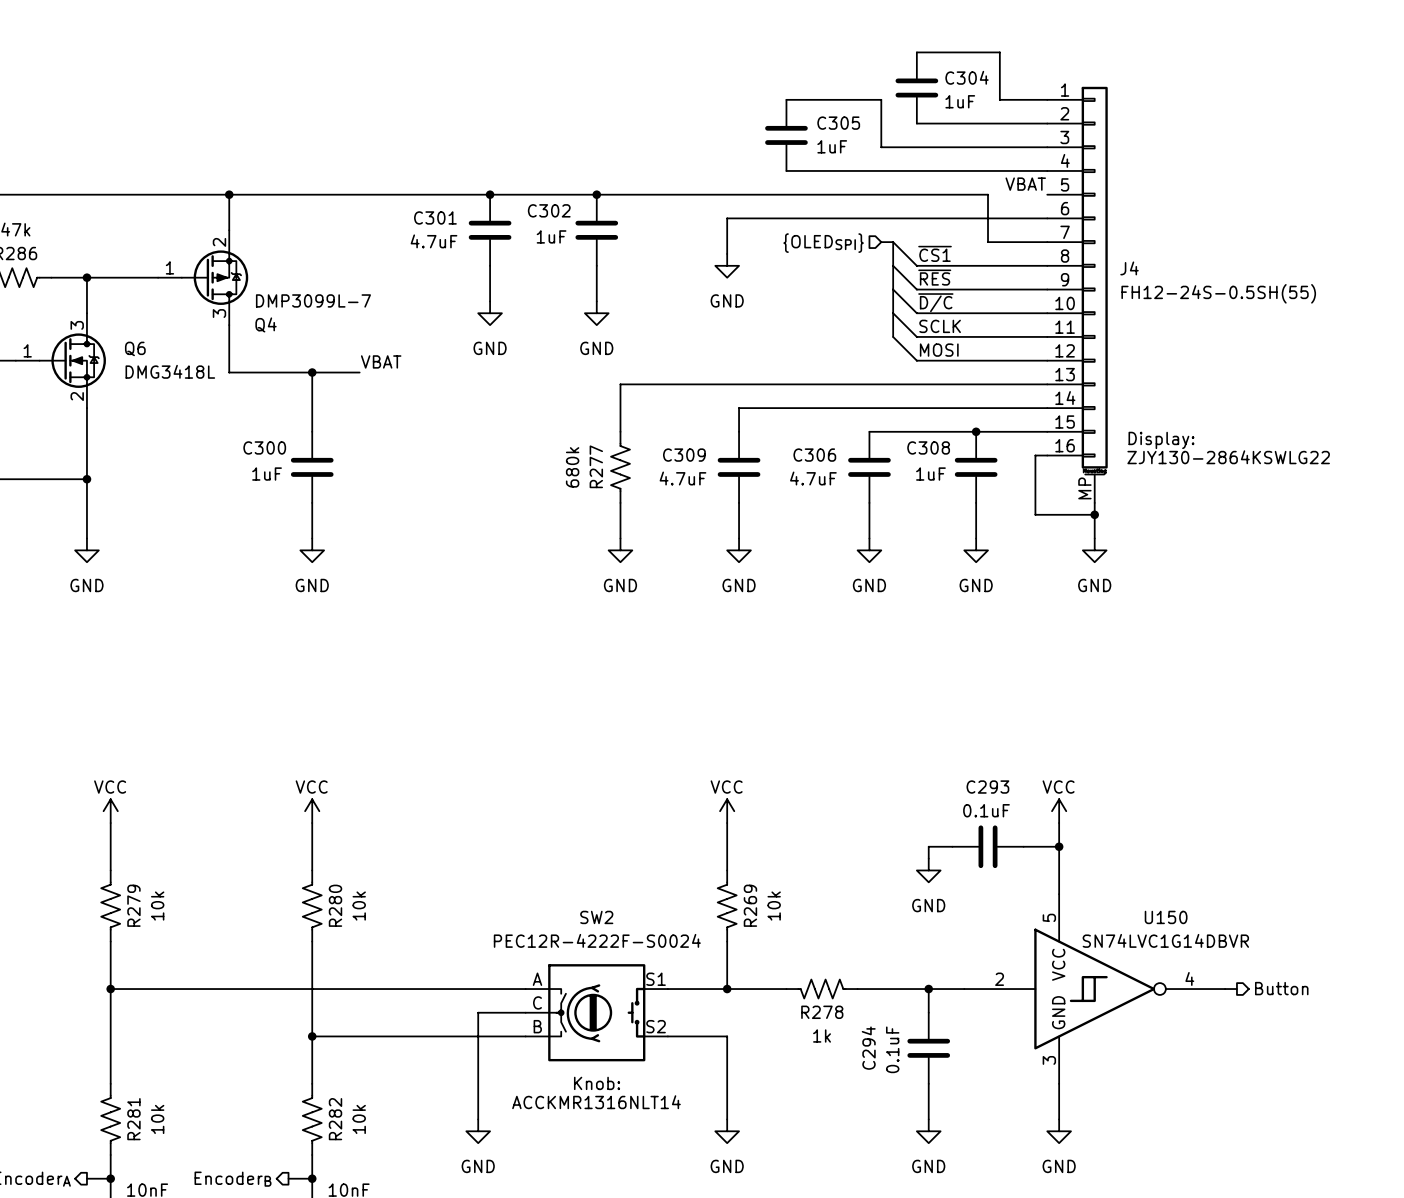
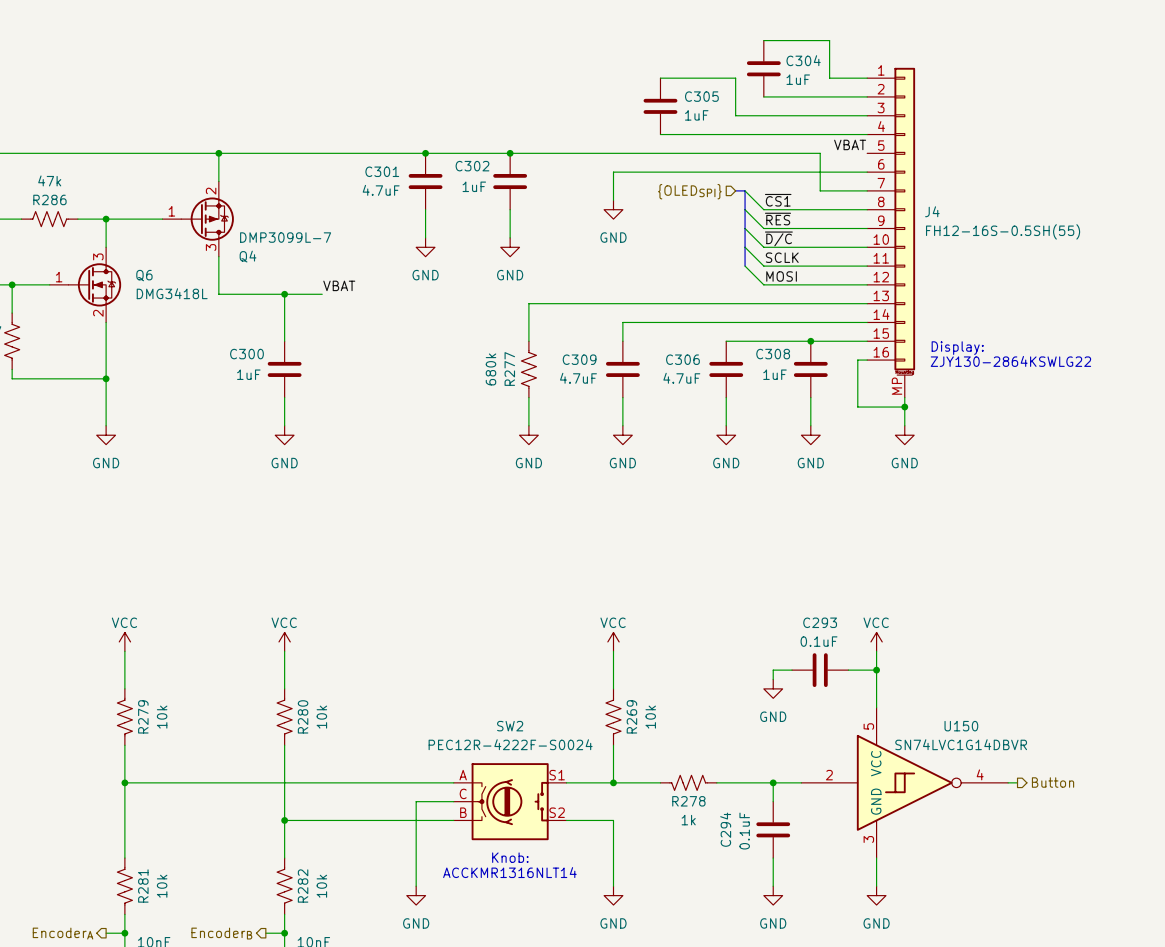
J4 value: FH12-24S-0.5SH(55) (1218, 293) -> FH12-16S-0.5SH(55) (1003, 231)

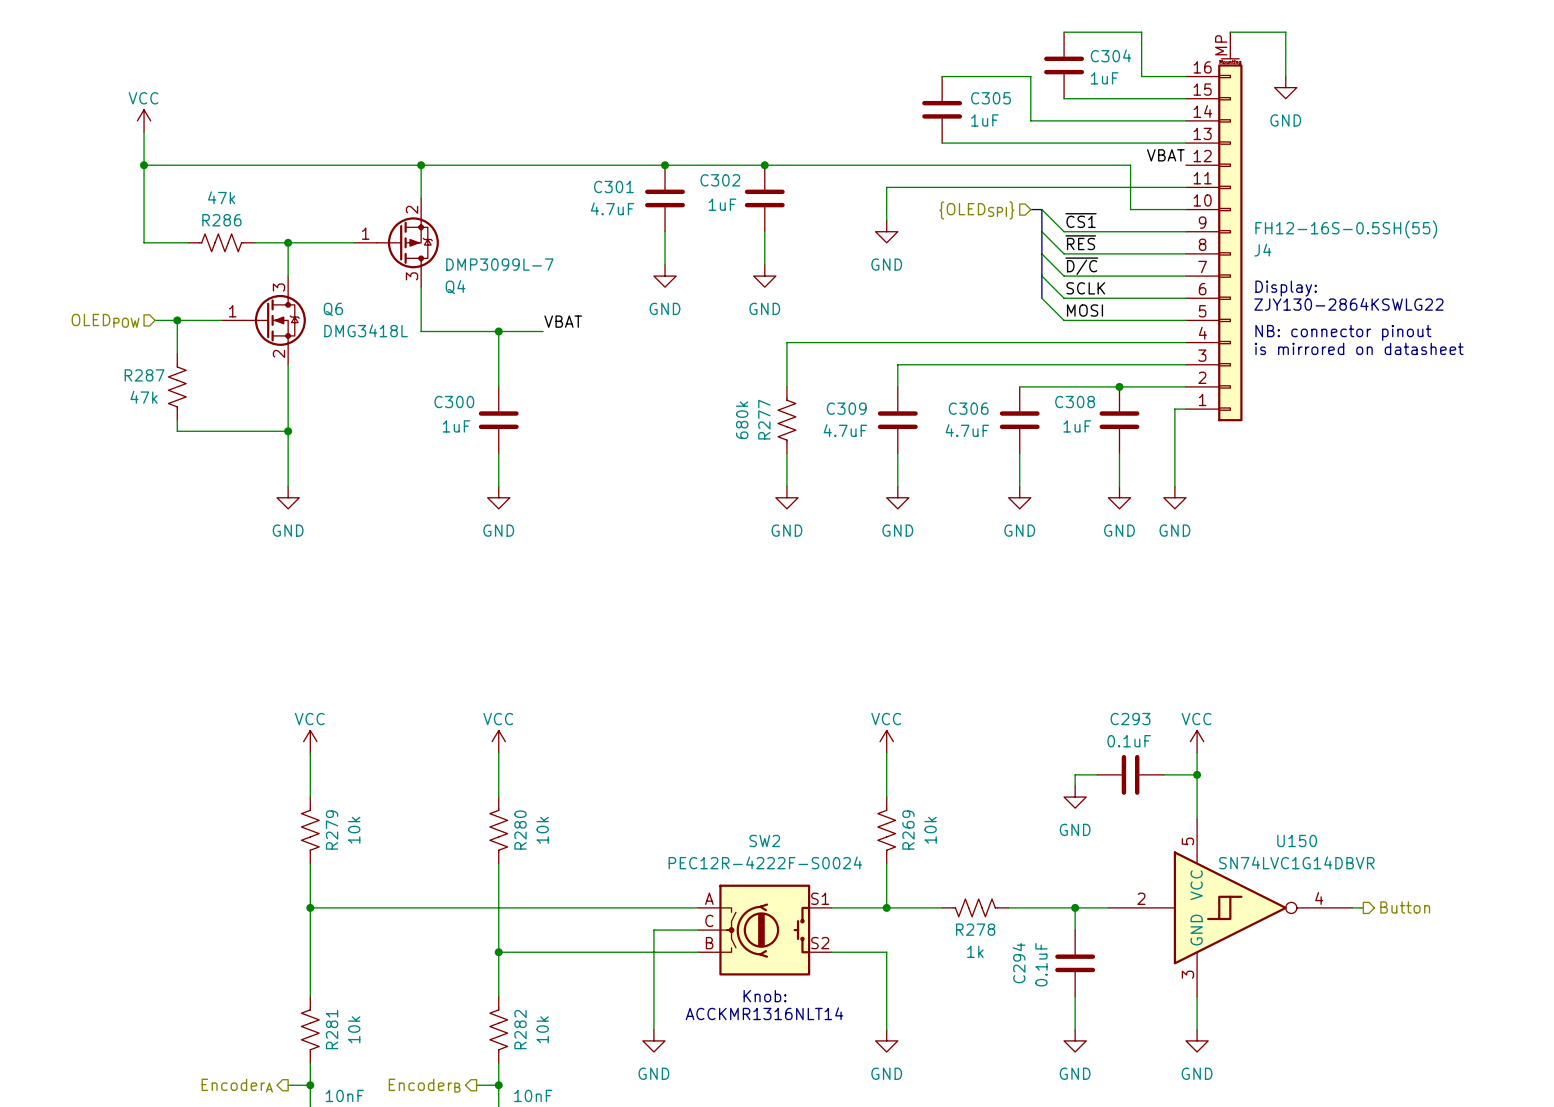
wire: none -> (1230, 32) (1285, 32) (1285, 76)
power symbol: none -> GND (1285, 87)
J4 flip: as is (904, 221) -> up-down (1230, 239)
text: none -> NB: connector pinout (1343, 332)
text: none -> is mirrored on datasheet (1359, 348)
text position: Display: (957, 348) -> Display: (1286, 288)
text position: ZJY130-2864KSWLG22 (1010, 361) -> ZJY130-2864KSWLG22 (1348, 304)
wire: (904, 397) (904, 425) -> none
wire: (857, 407) (904, 407) -> (1174, 464) (1174, 486)
junction: (904, 407) -> none
power symbol position: GND (904, 435) -> GND (1174, 497)

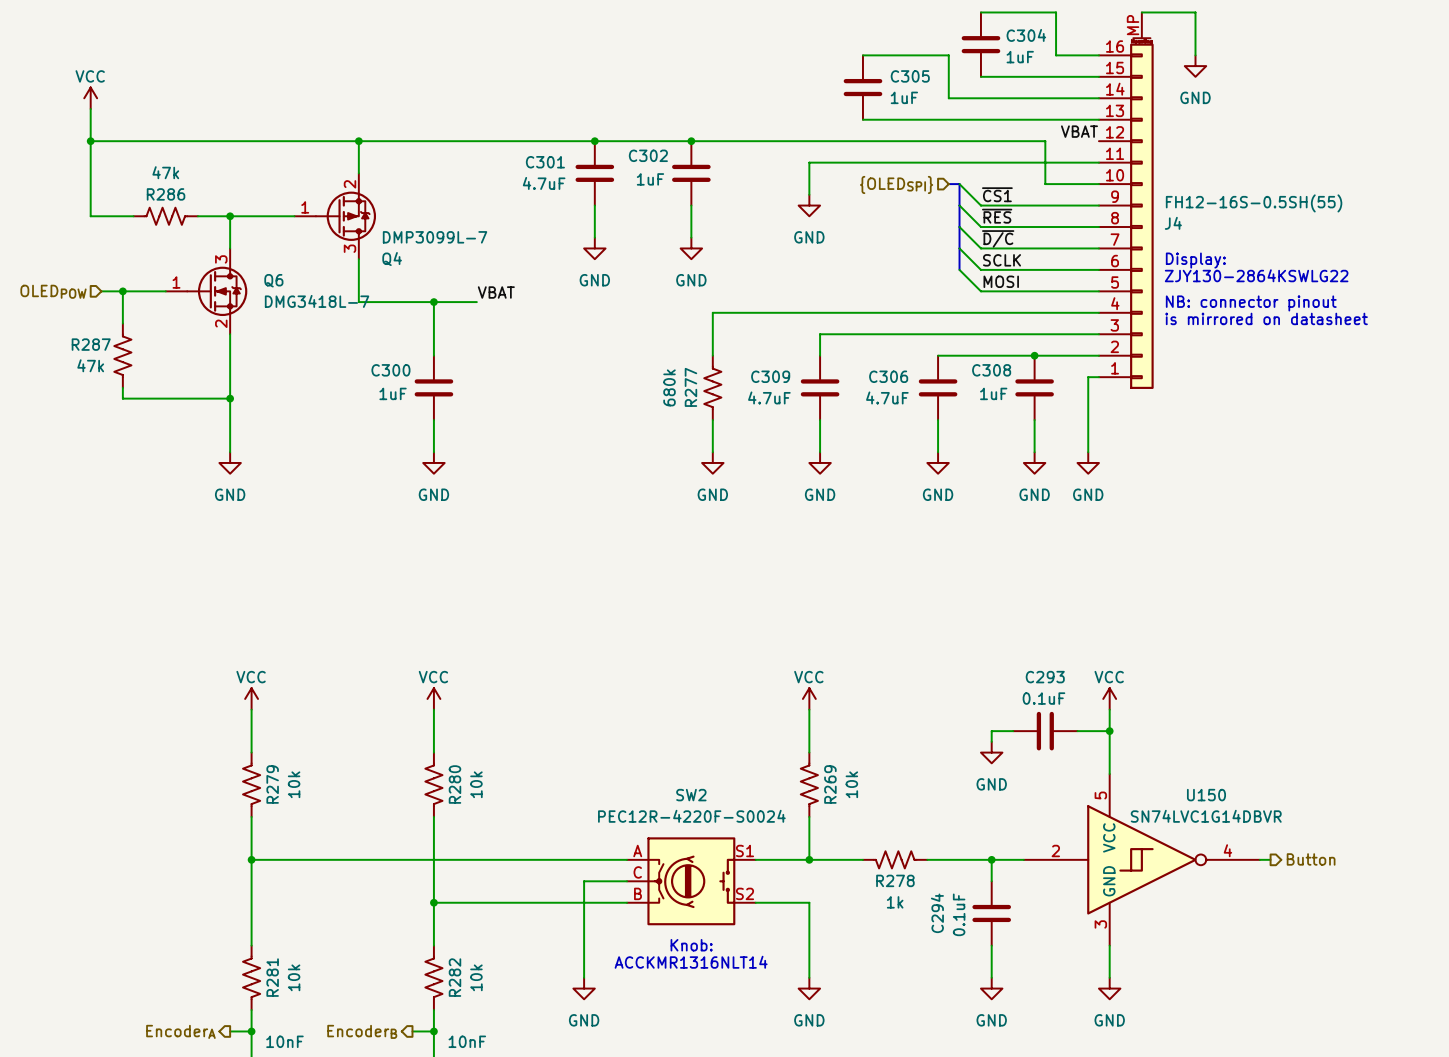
Q6 value: DMG3418L (366, 330) -> DMG3418L-7 (317, 301)
SW2 value: PEC12R-4222F-S0024 (765, 862) -> PEC12R-4220F-S0024 (691, 816)

